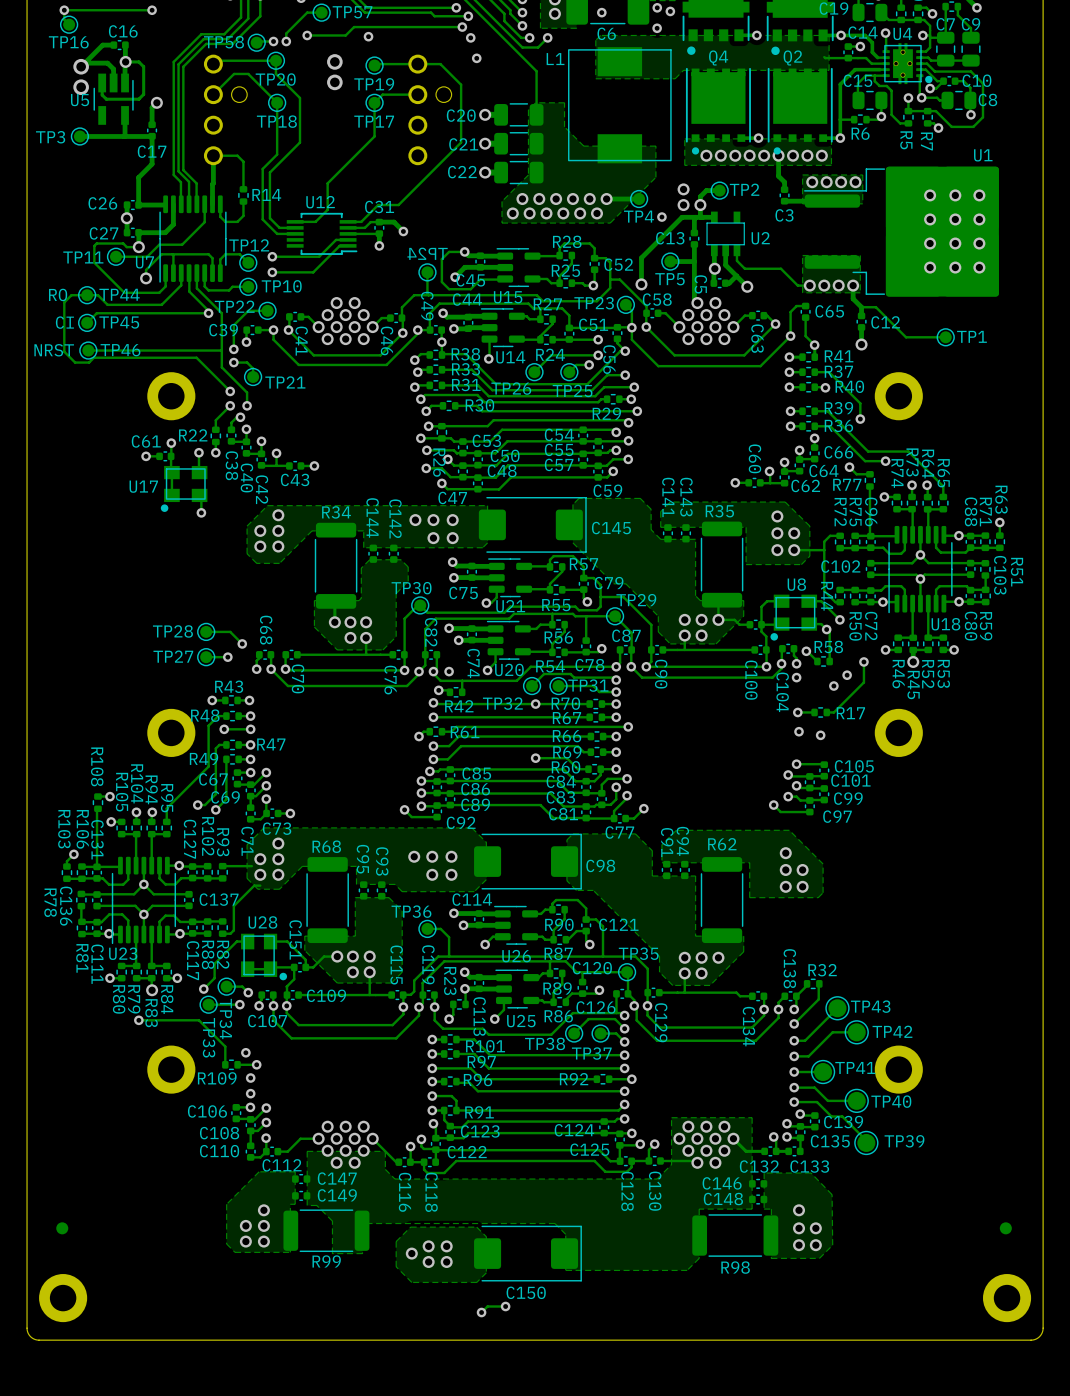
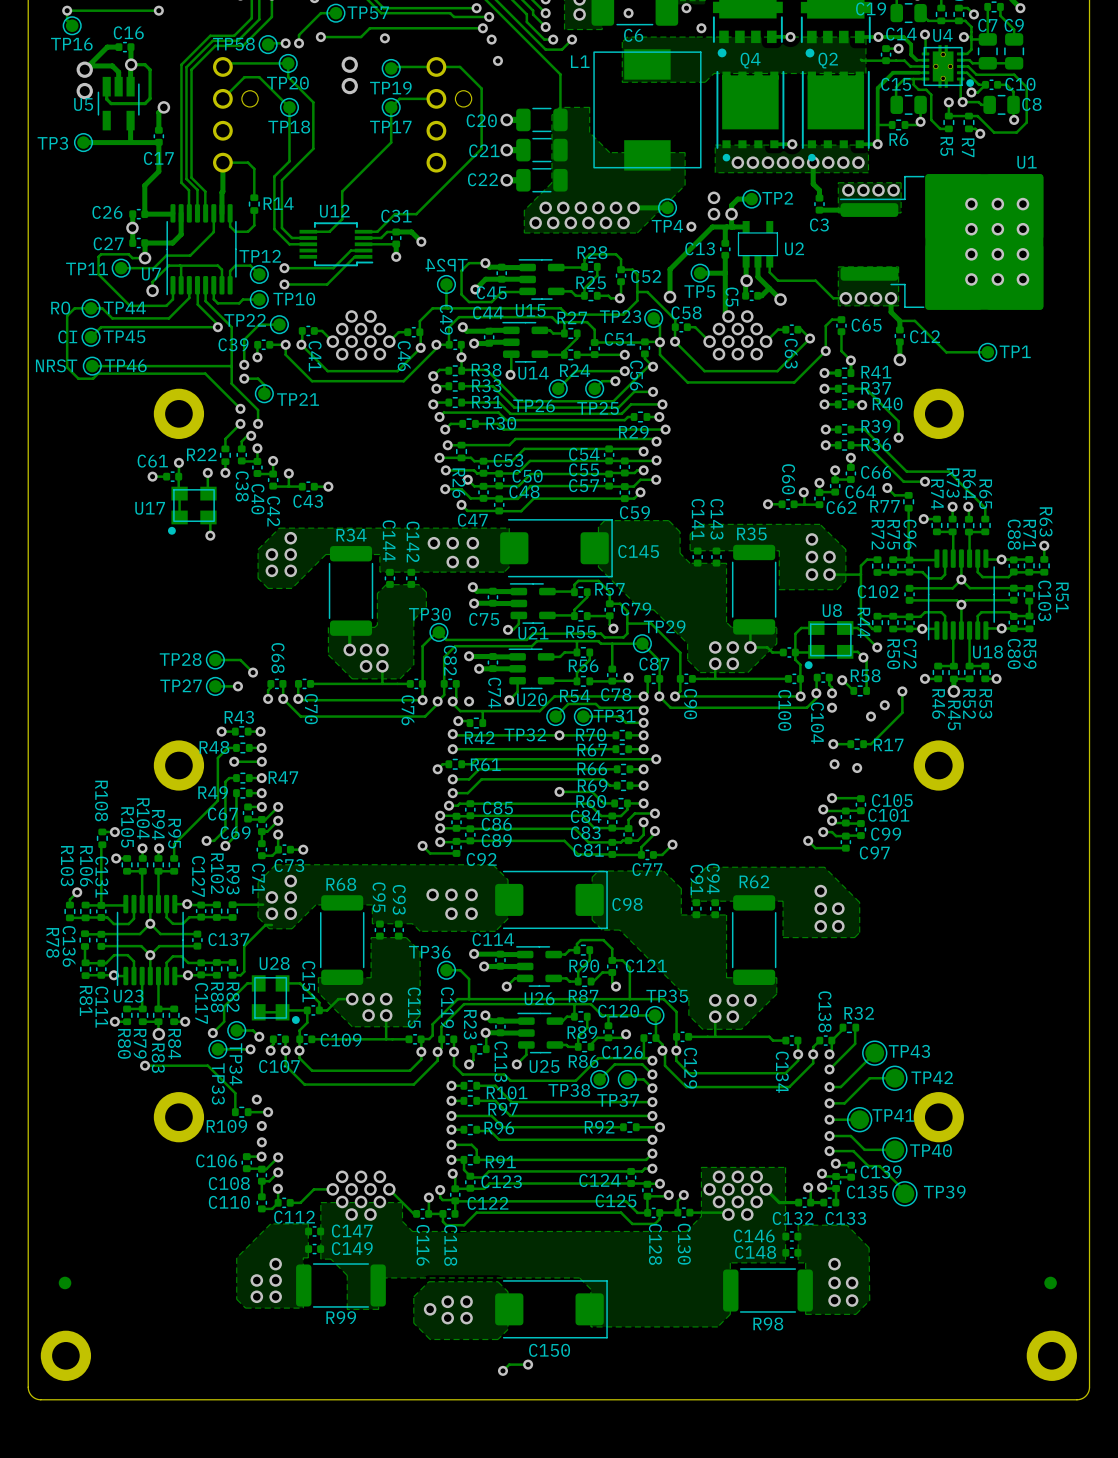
via: (670, 11) -> none
via: none -> (701, 28)
via: (657, 28) -> none

